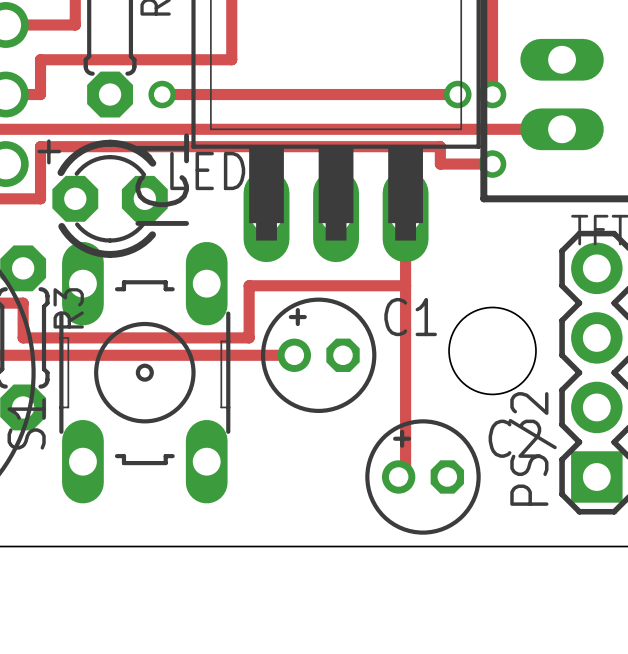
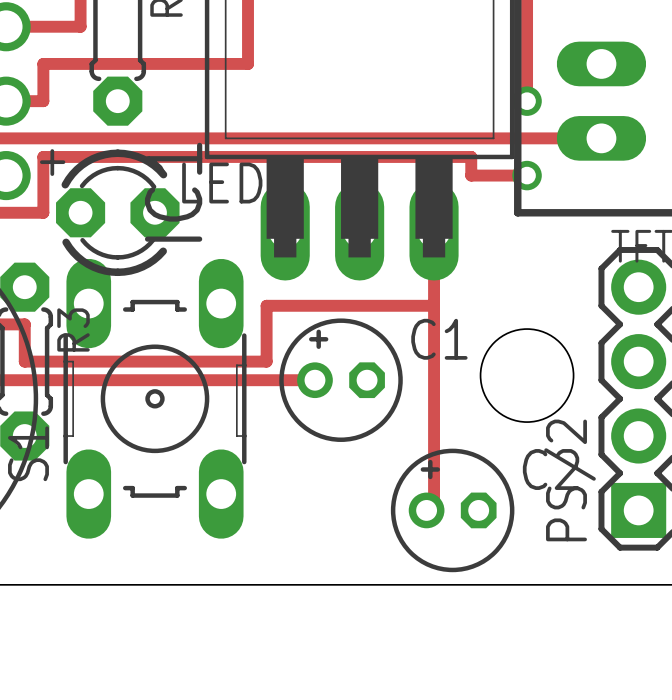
track: (162, 94) (457, 94) -> none
via: (162, 94) -> none
via: (457, 94) -> none

